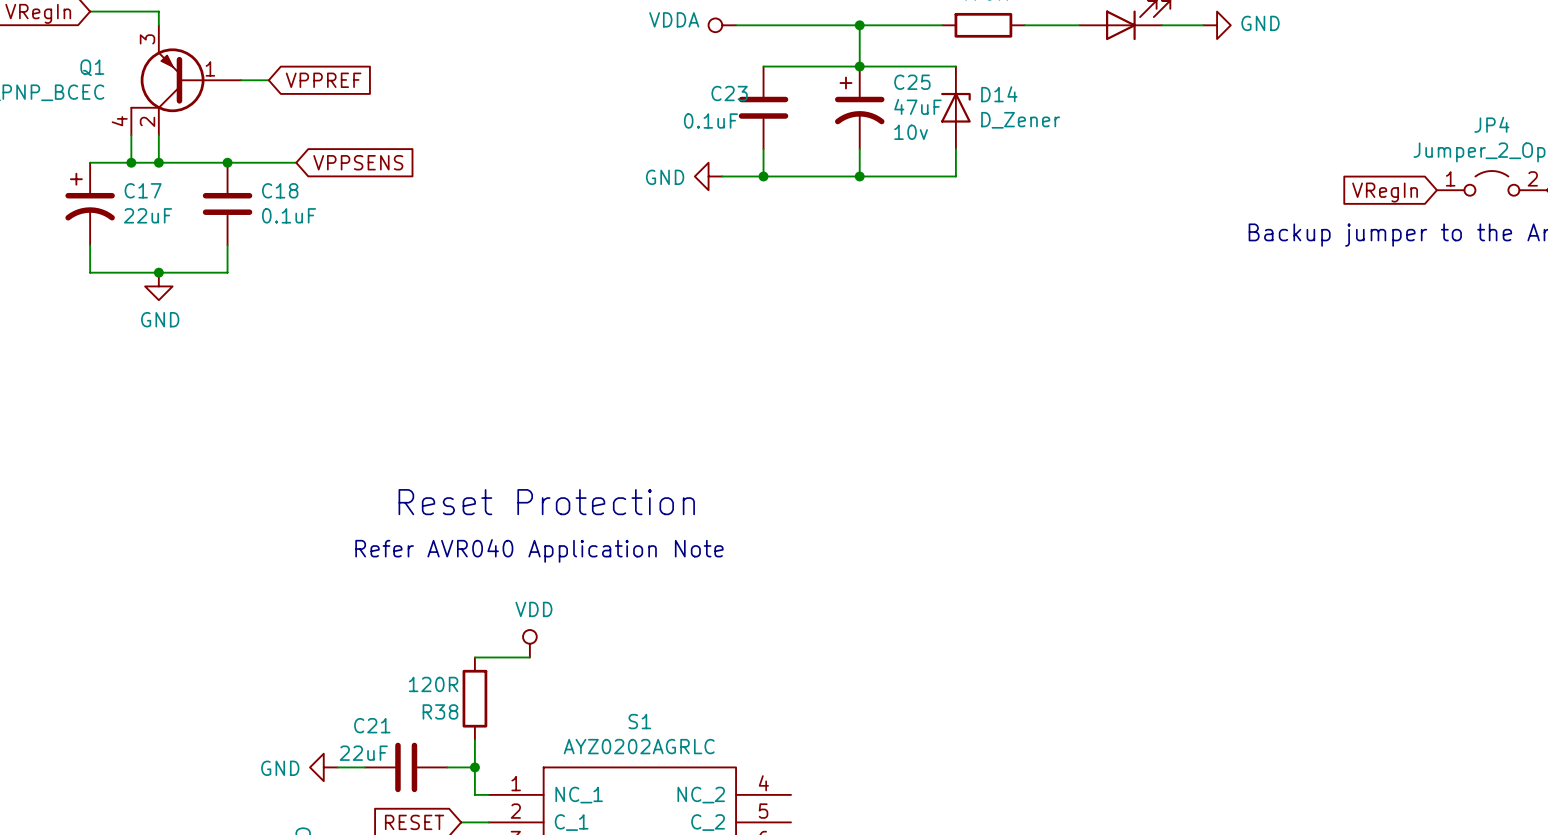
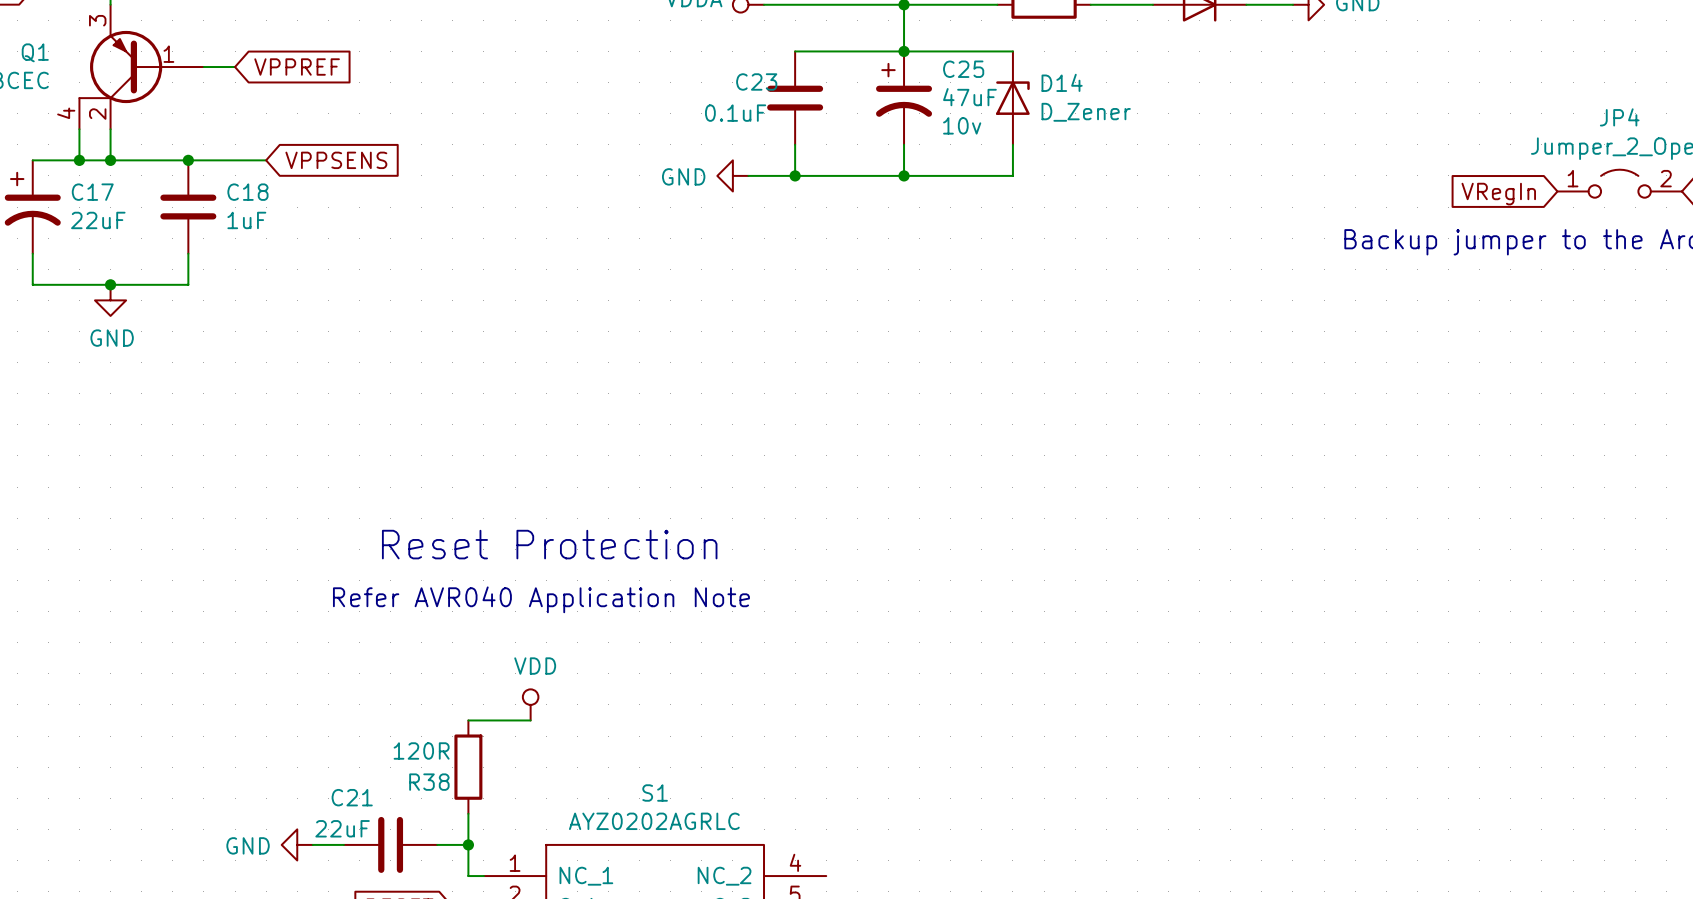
C18 value: 0.1uF (289, 215) -> 1uF (246, 220)

